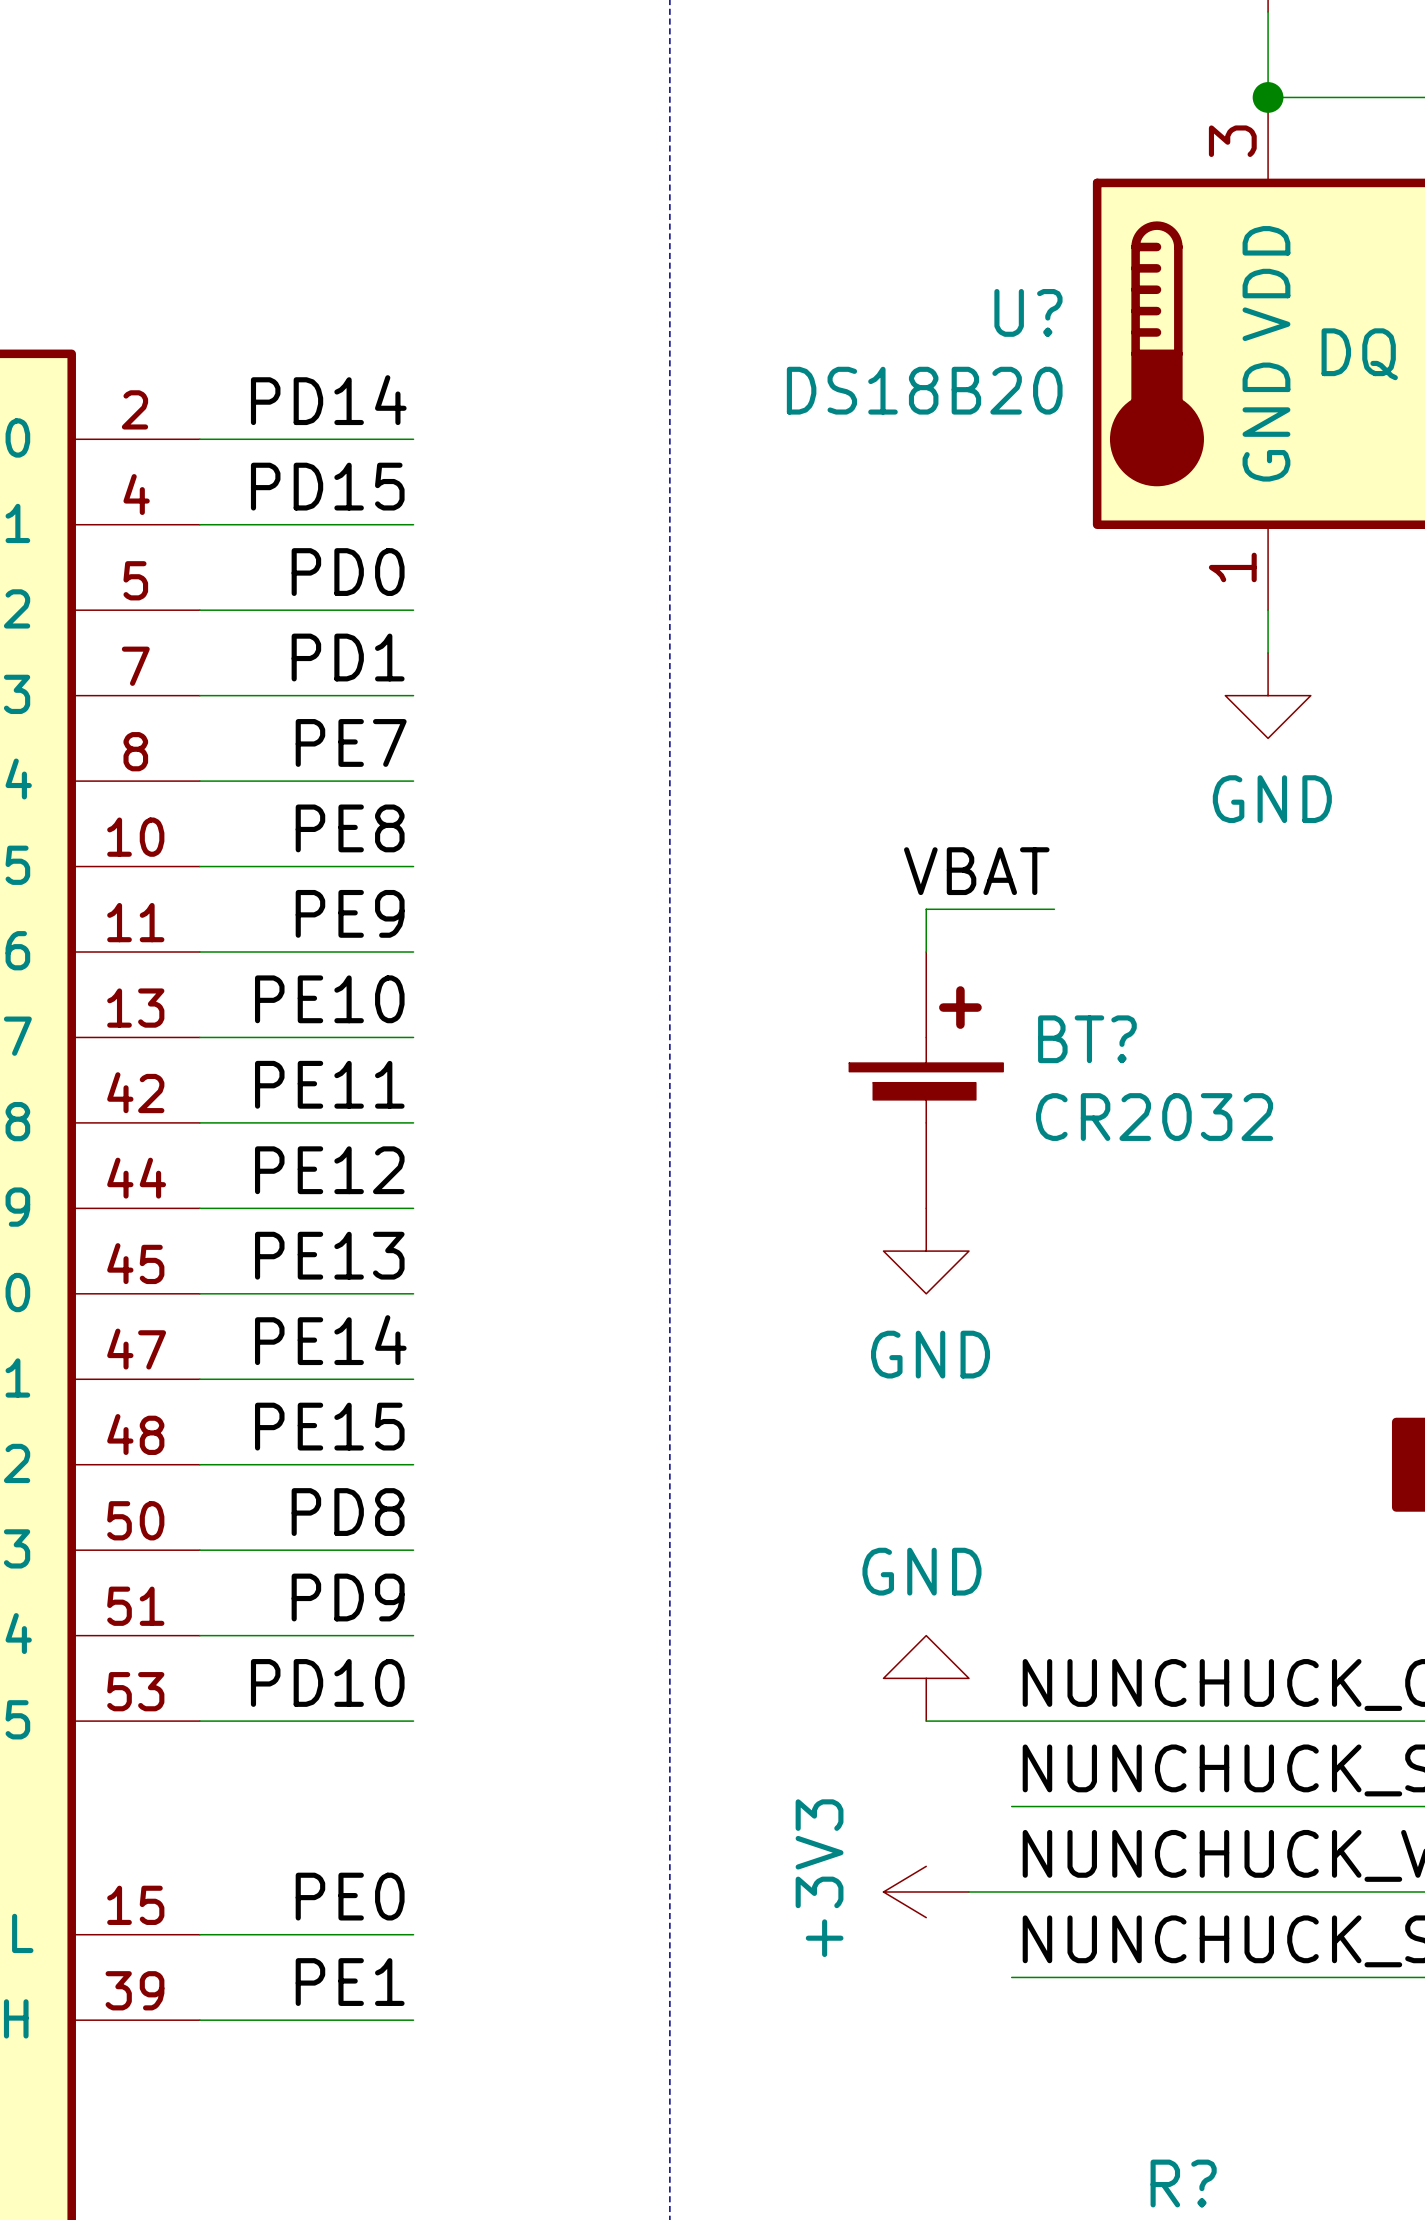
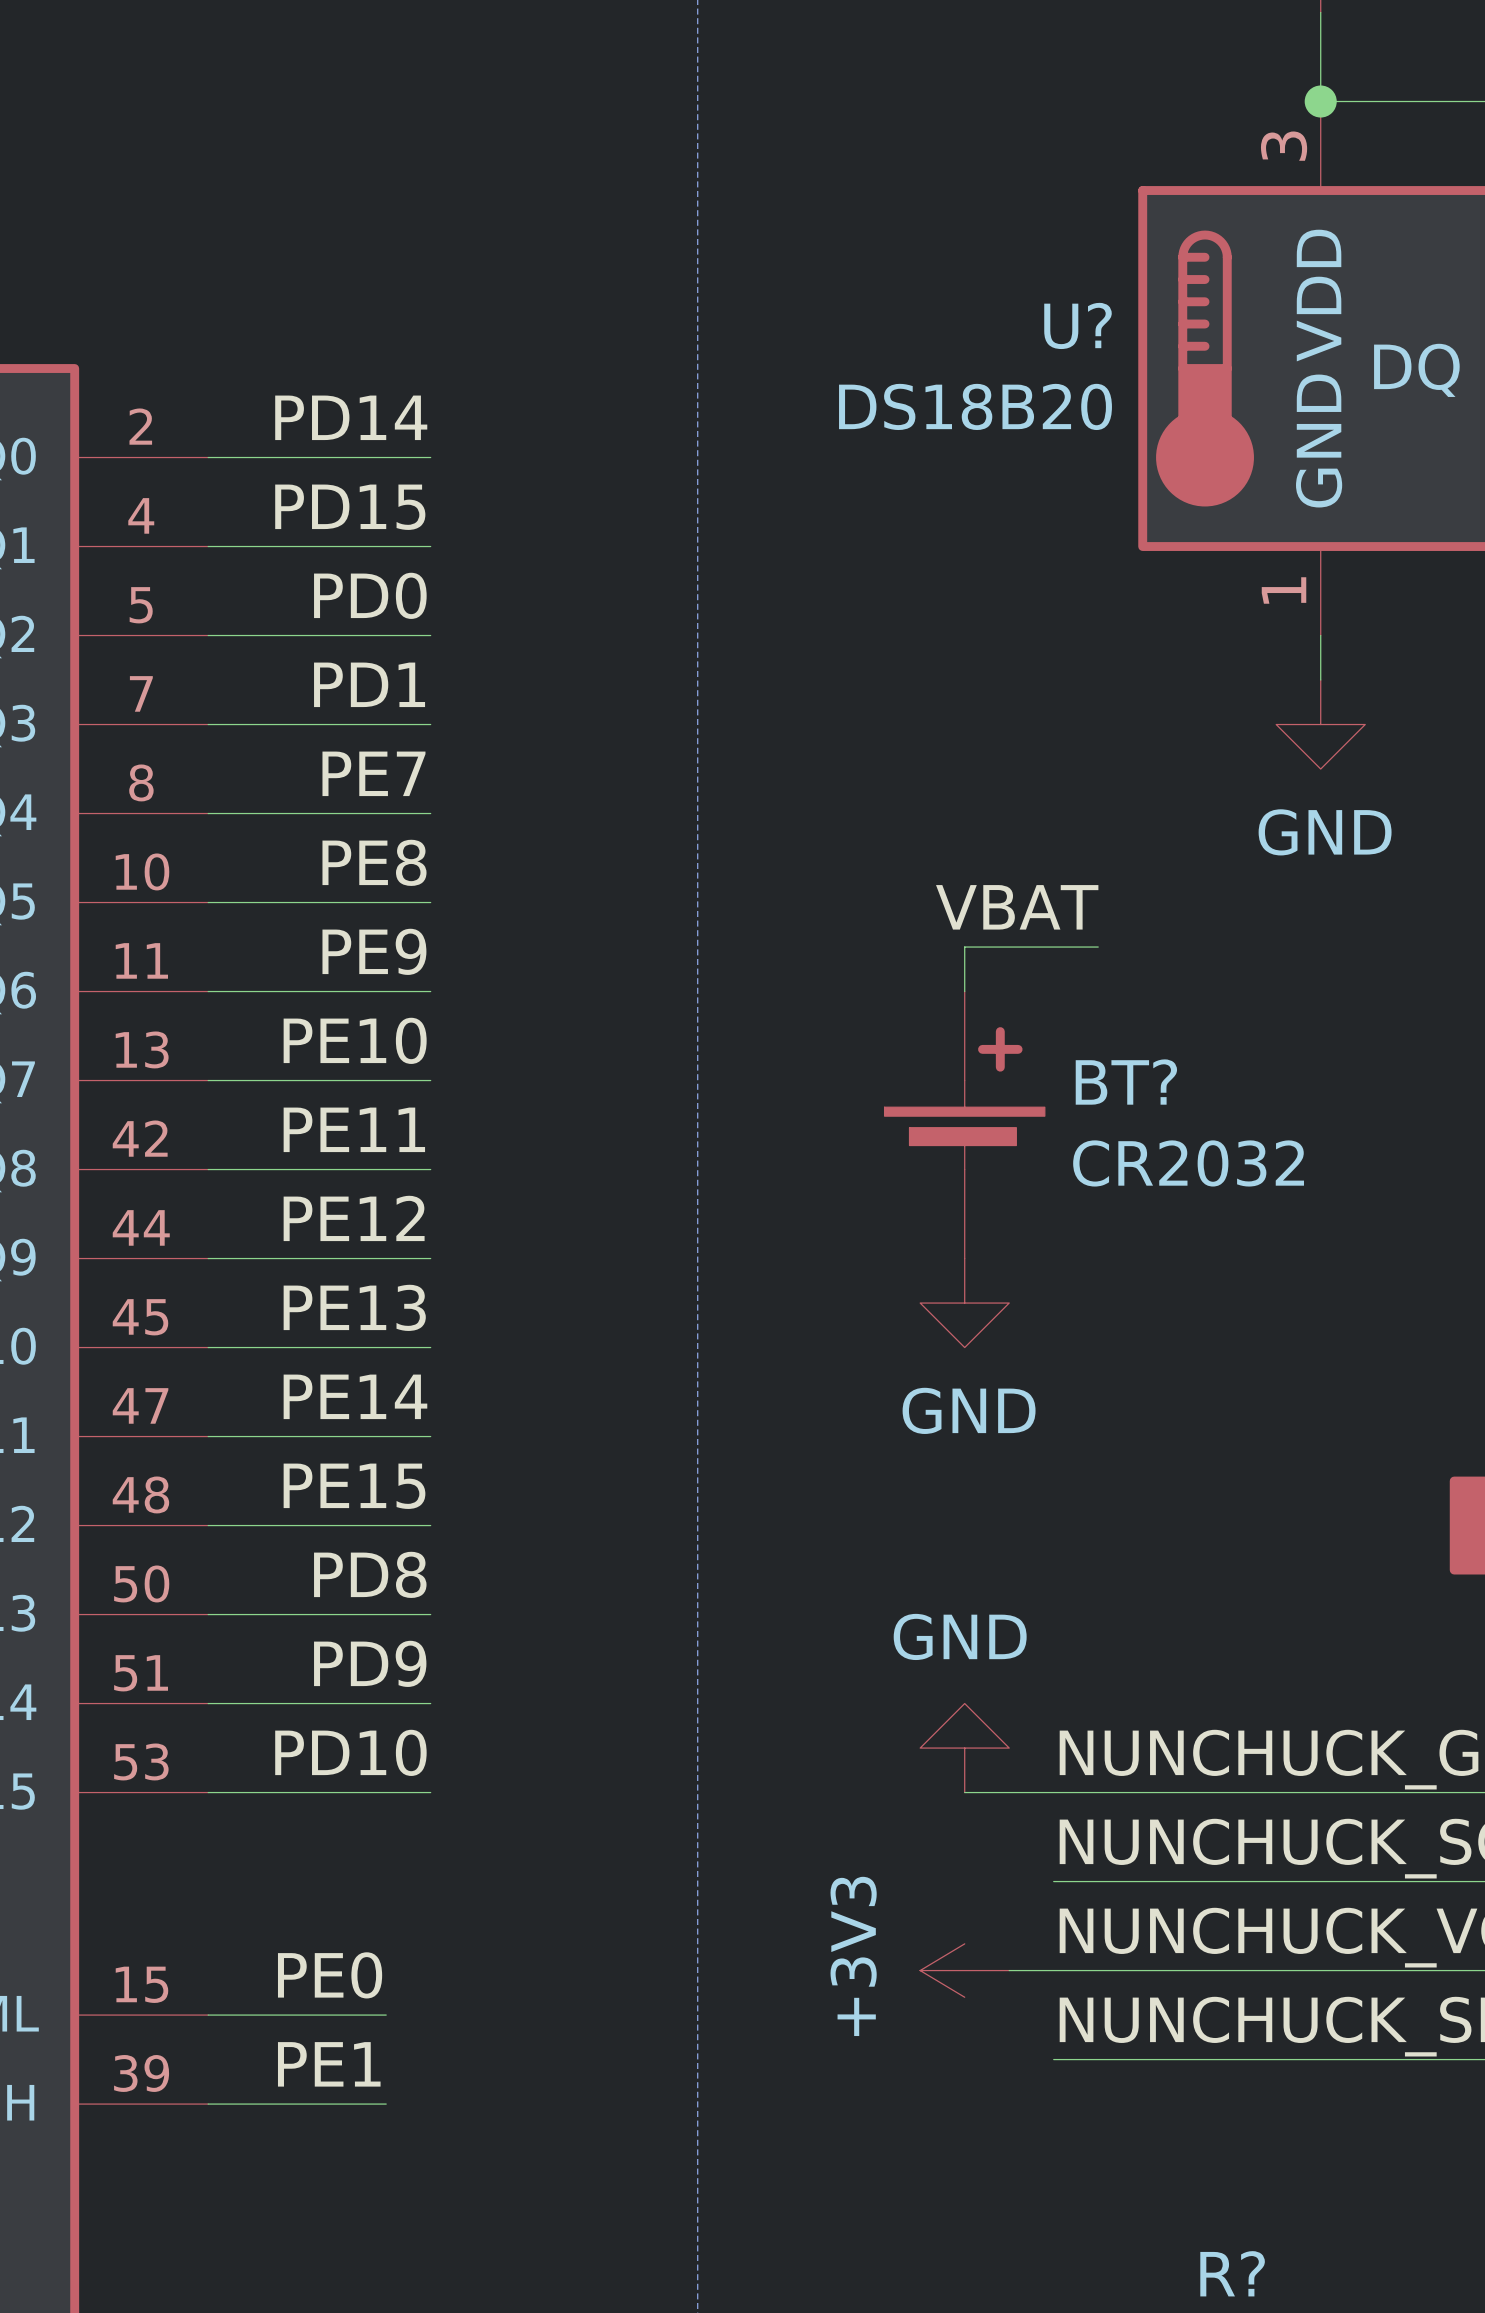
label position: PE0 (350, 1896) -> PE0 (330, 1975)
wire: (370, 1934) (413, 1934) -> none
label position: PE1 (350, 1982) -> PE1 (329, 2064)
wire: (370, 2020) (413, 2020) -> none

